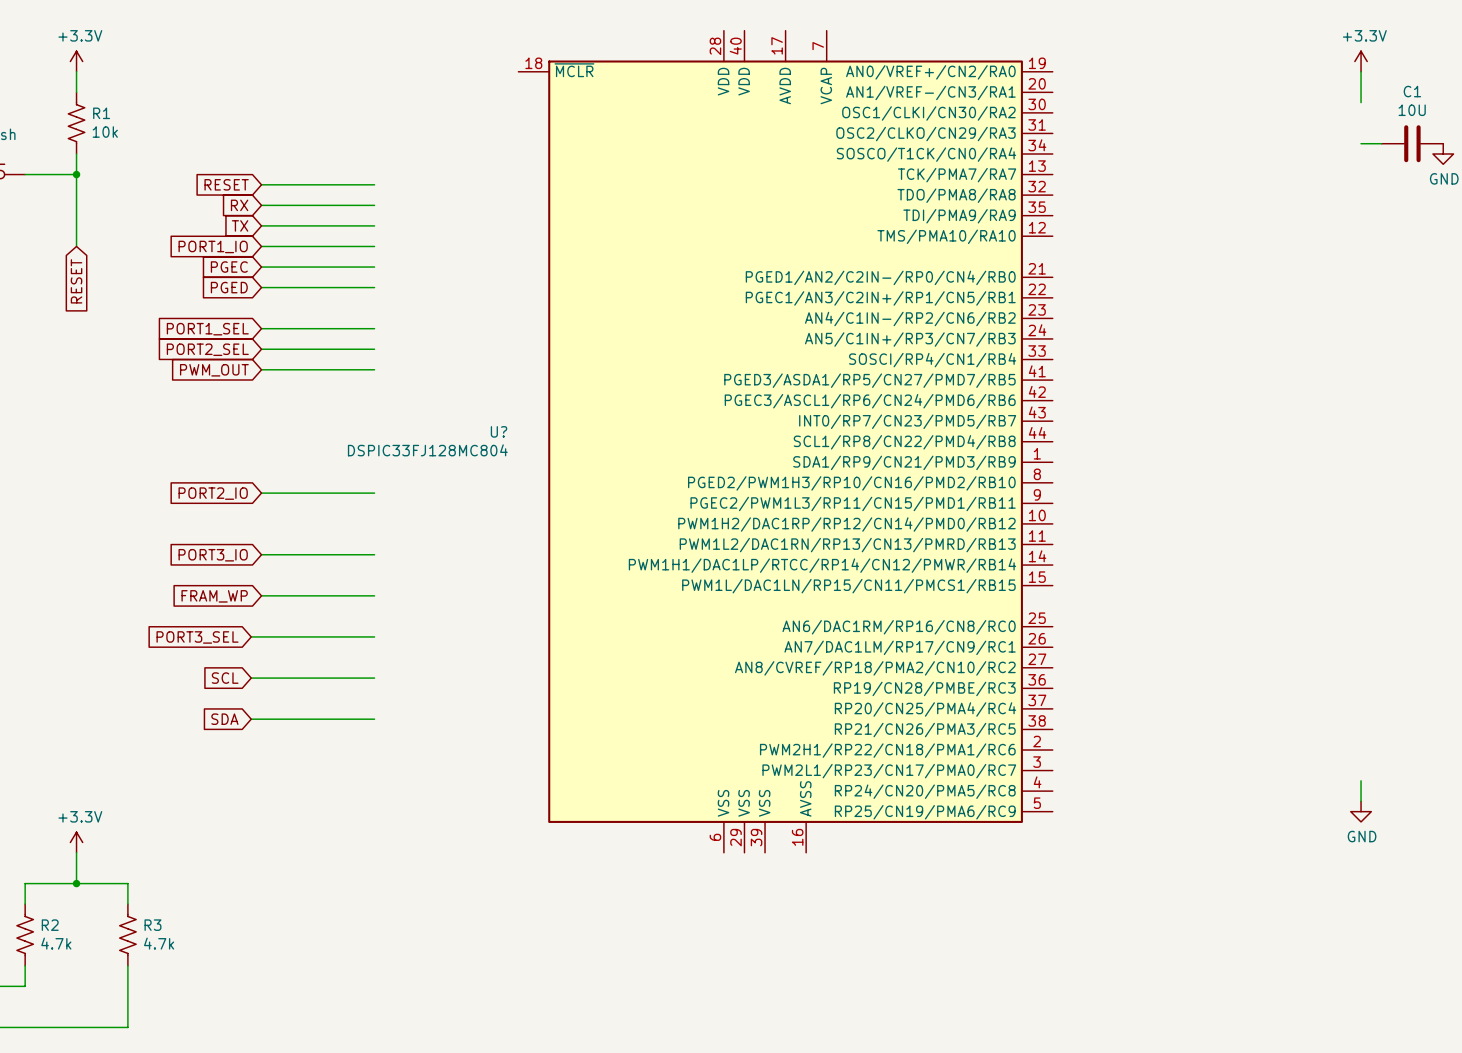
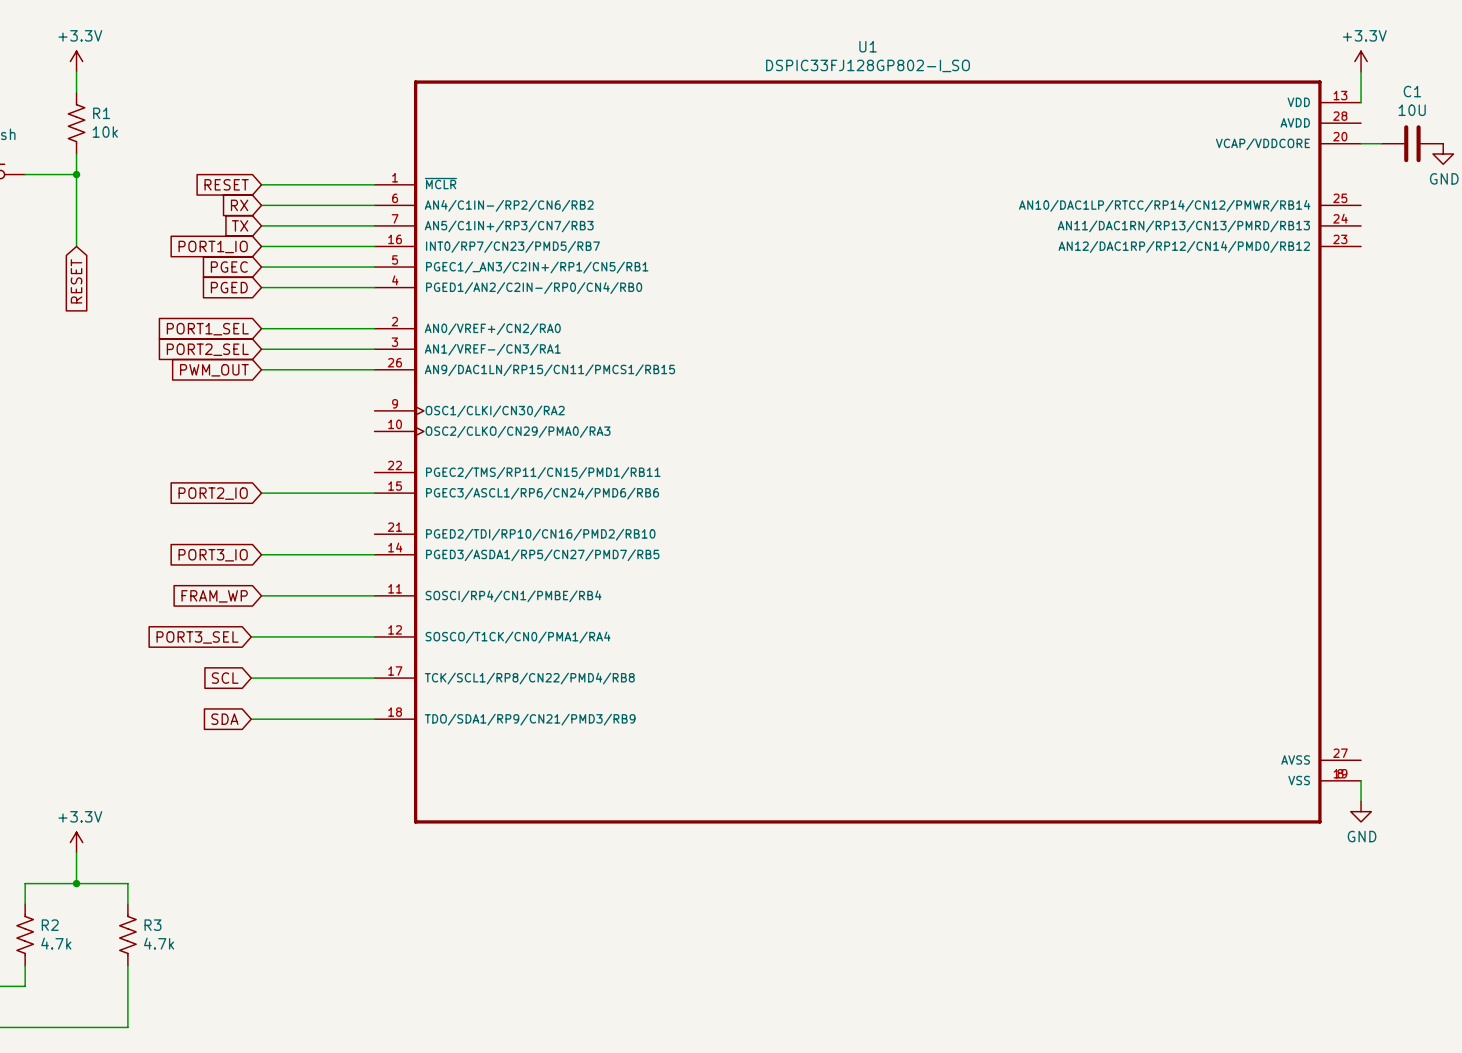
U?: DSPIC33FJ128MC804 (785, 441) -> none
U1: none -> DSPIC33FJ128GP802-I_SO (867, 452)

